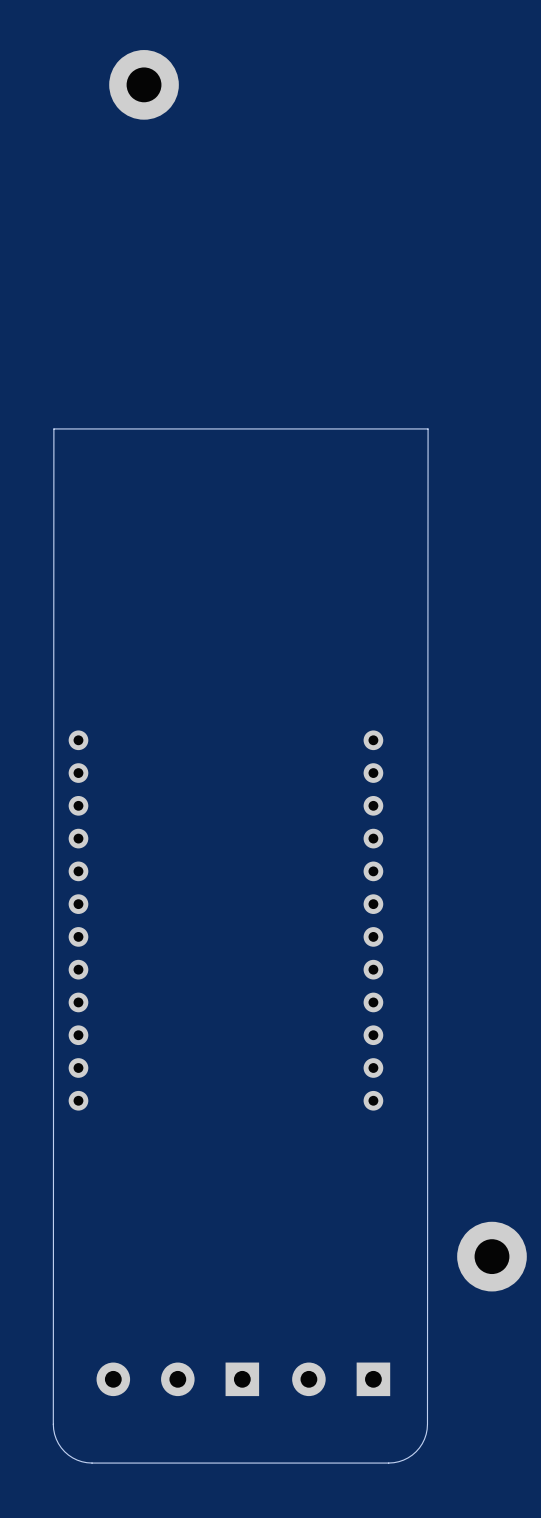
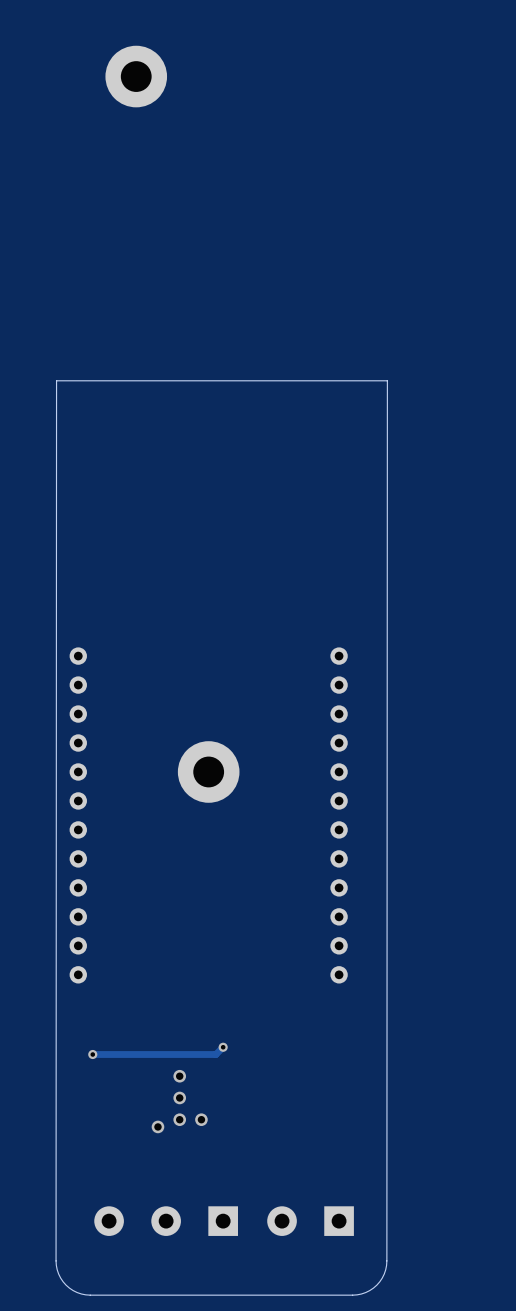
part: none -> (208, 771)
track: none -> (223, 1047) (215, 1054) (92, 1054)
via: none -> (223, 1047)
via: none -> (92, 1054)
via: none -> (179, 1076)
via: none -> (179, 1097)
part: (491, 1256) -> none
via: none -> (179, 1119)
via: none -> (201, 1119)
via: none -> (157, 1126)

